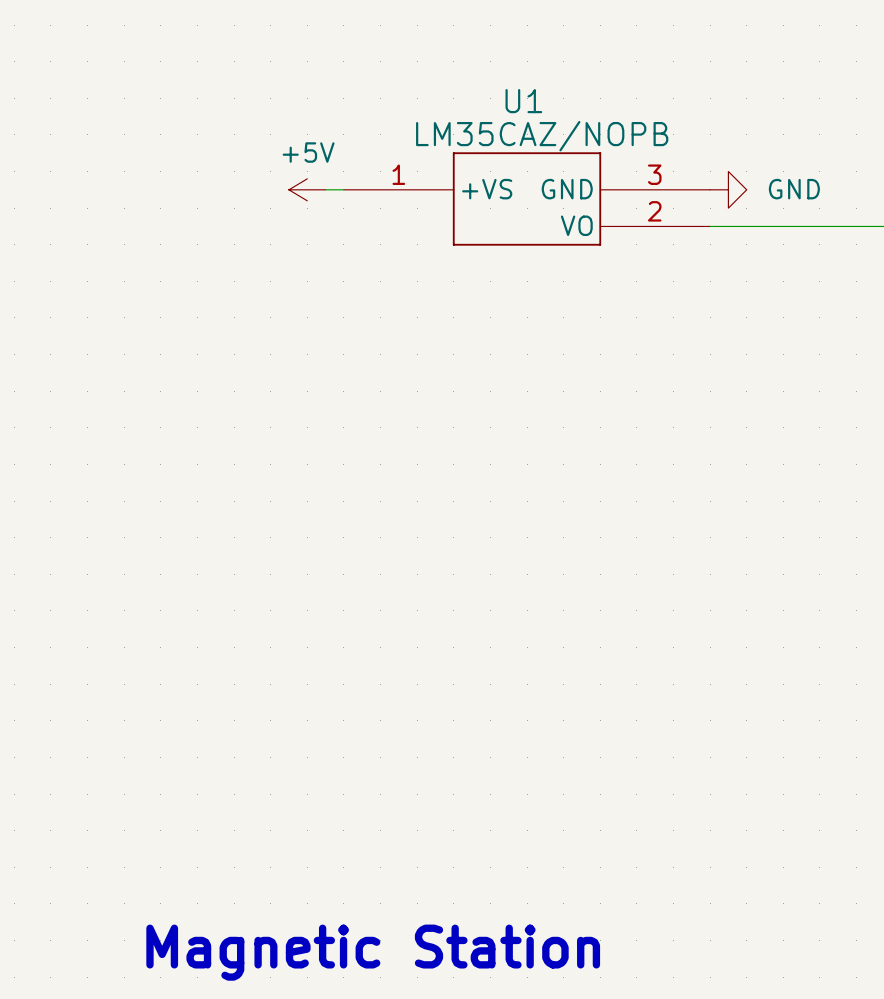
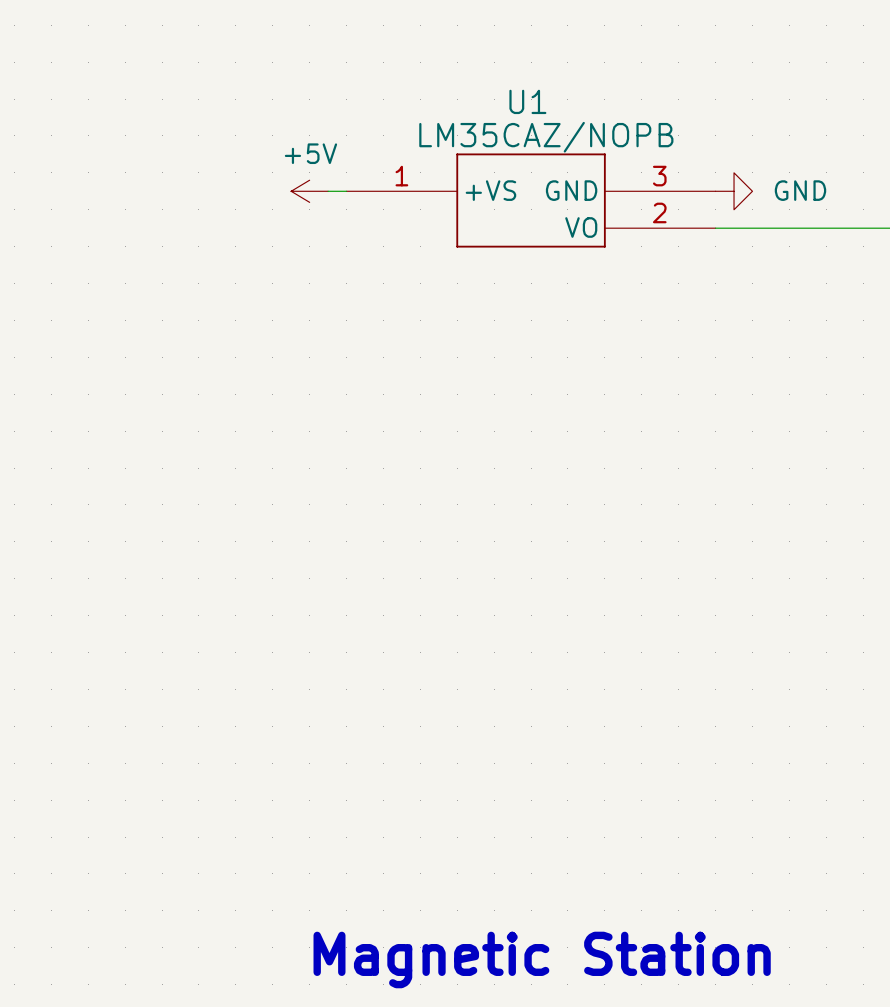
text position: Magnetic Station (373, 952) -> Magnetic Station (542, 959)

